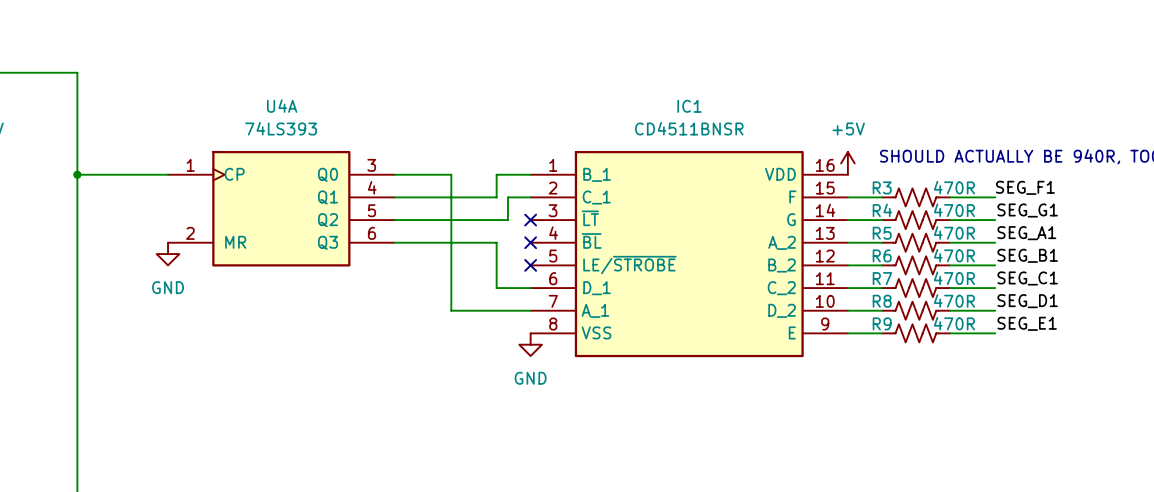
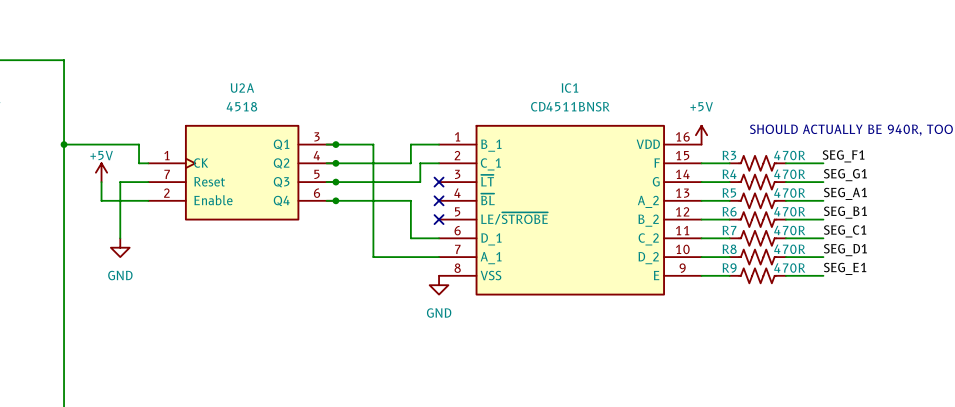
wire: none -> (139, 144) (139, 163) (148, 163)
junction: none -> (335, 144)
junction: none -> (335, 163)
power symbol: none -> +5V (101, 172)
U4A: 74LS393 (281, 208) -> none
U2A: none -> 4518 (242, 172)
wire: none -> (101, 182) (101, 200) (148, 200)
wire: none -> (148, 182) (120, 182) (120, 238)
junction: none -> (335, 182)
junction: none -> (335, 200)
power symbol position: GND (168, 254) -> GND (120, 247)

